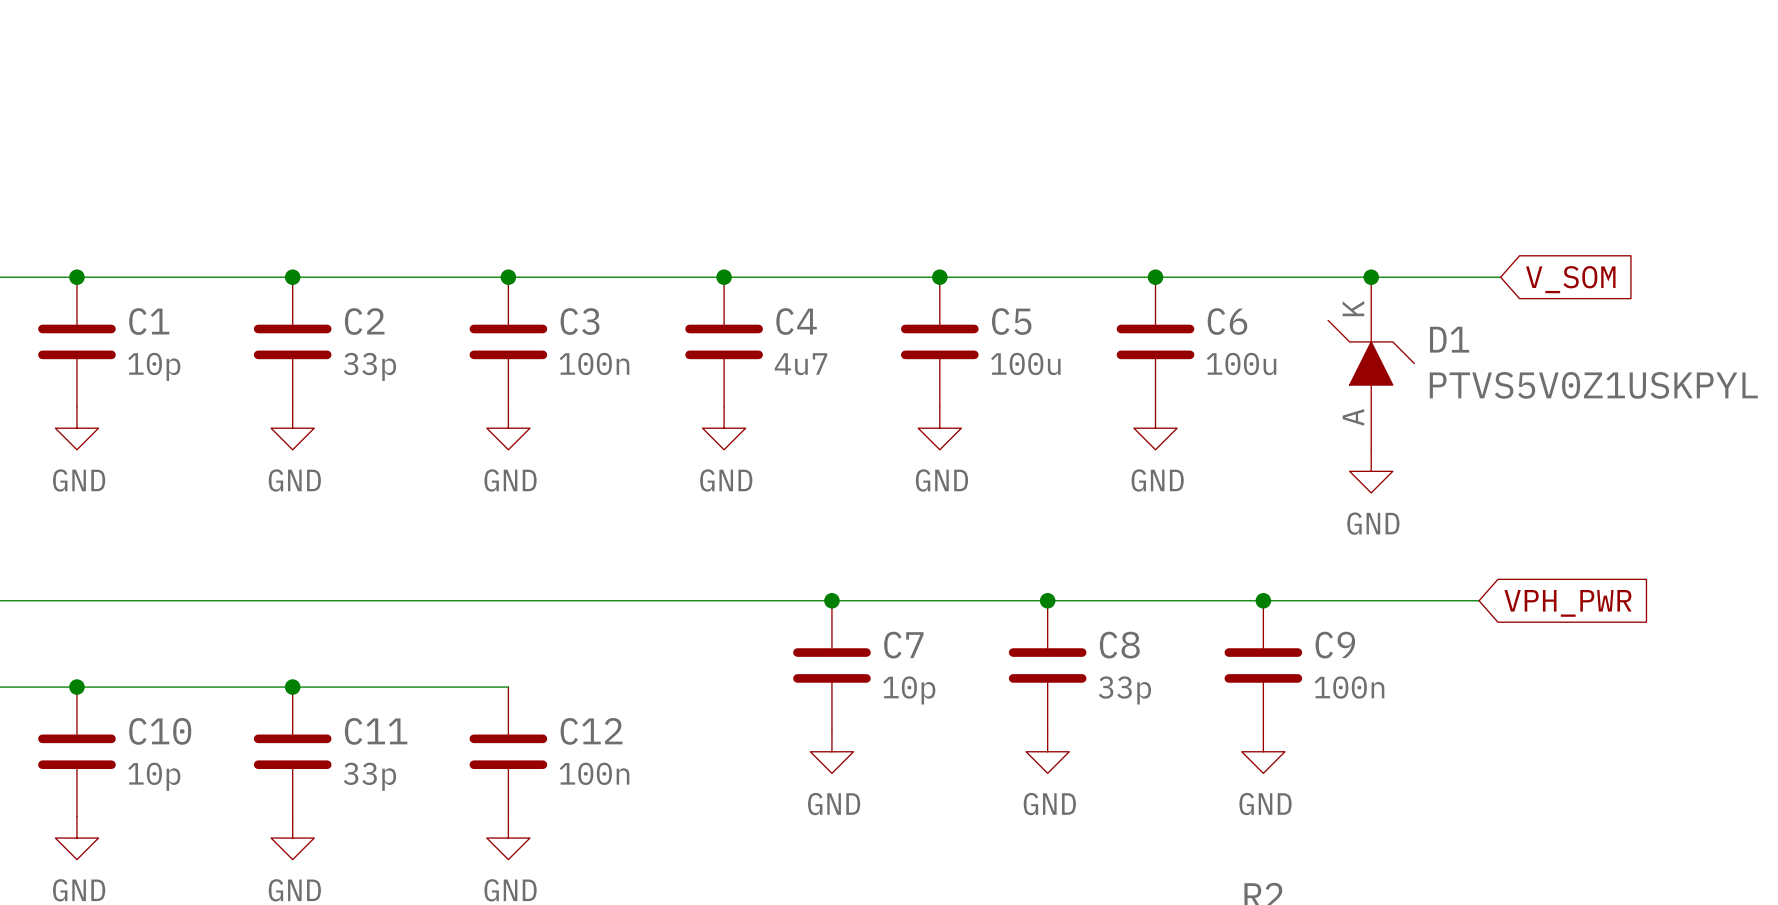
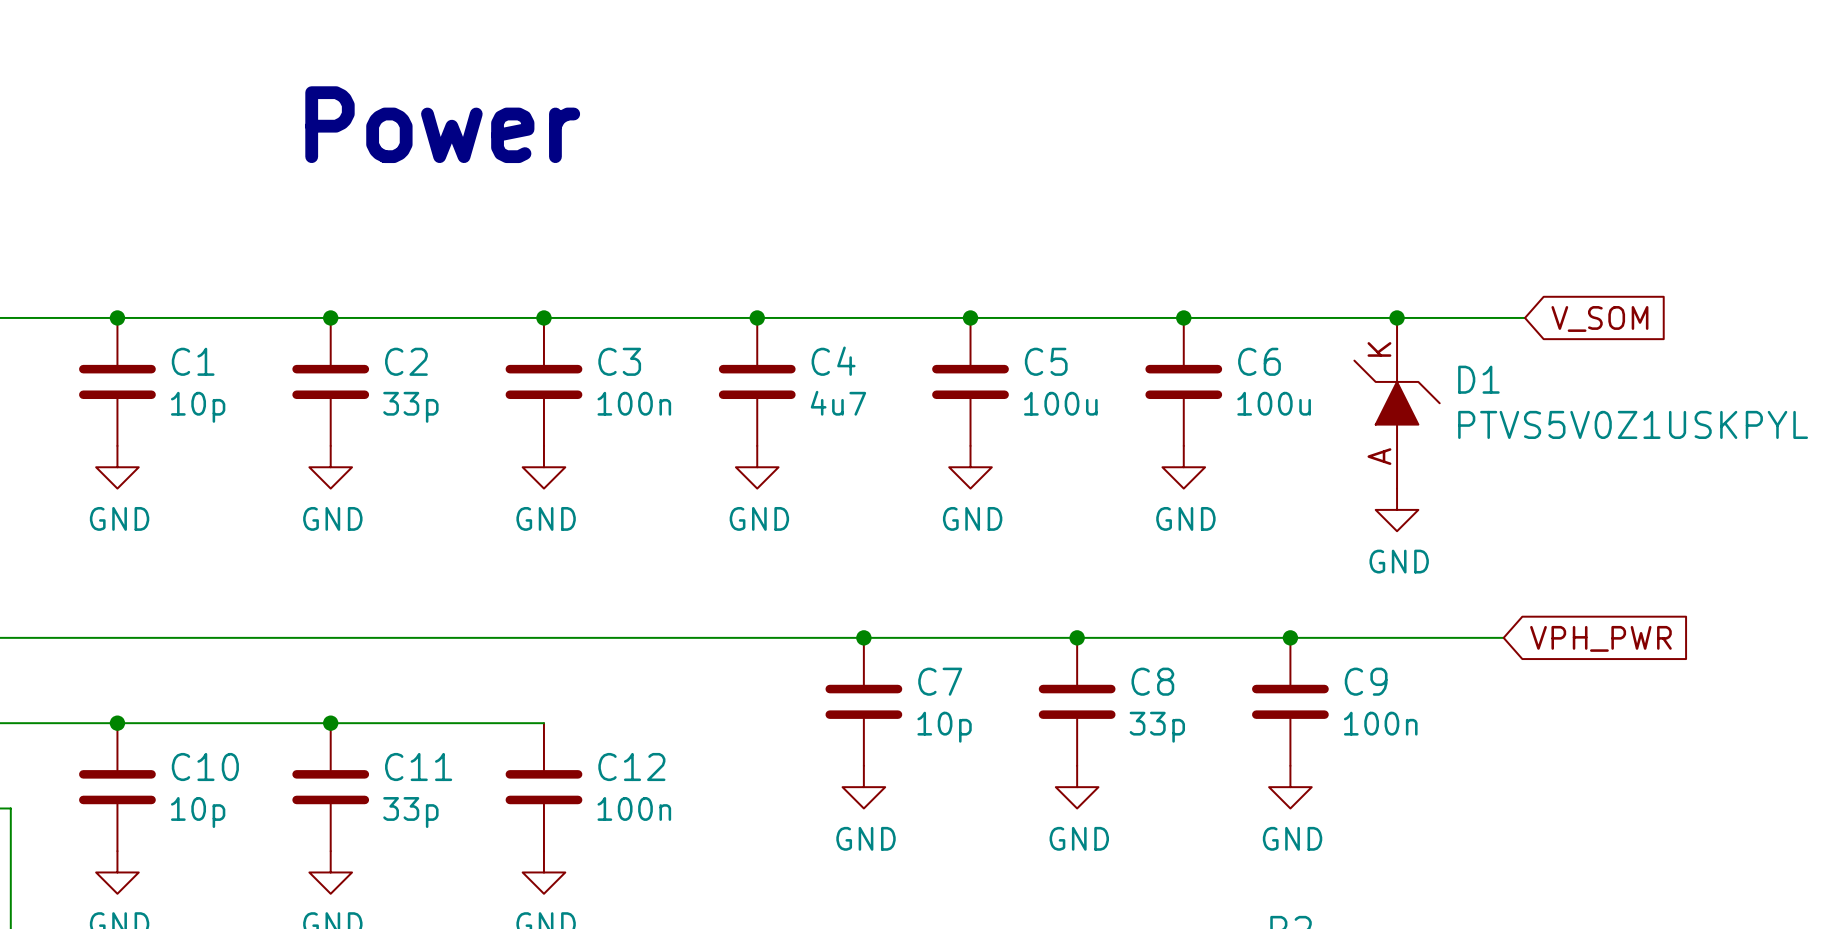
text: none -> Power (442, 124)

